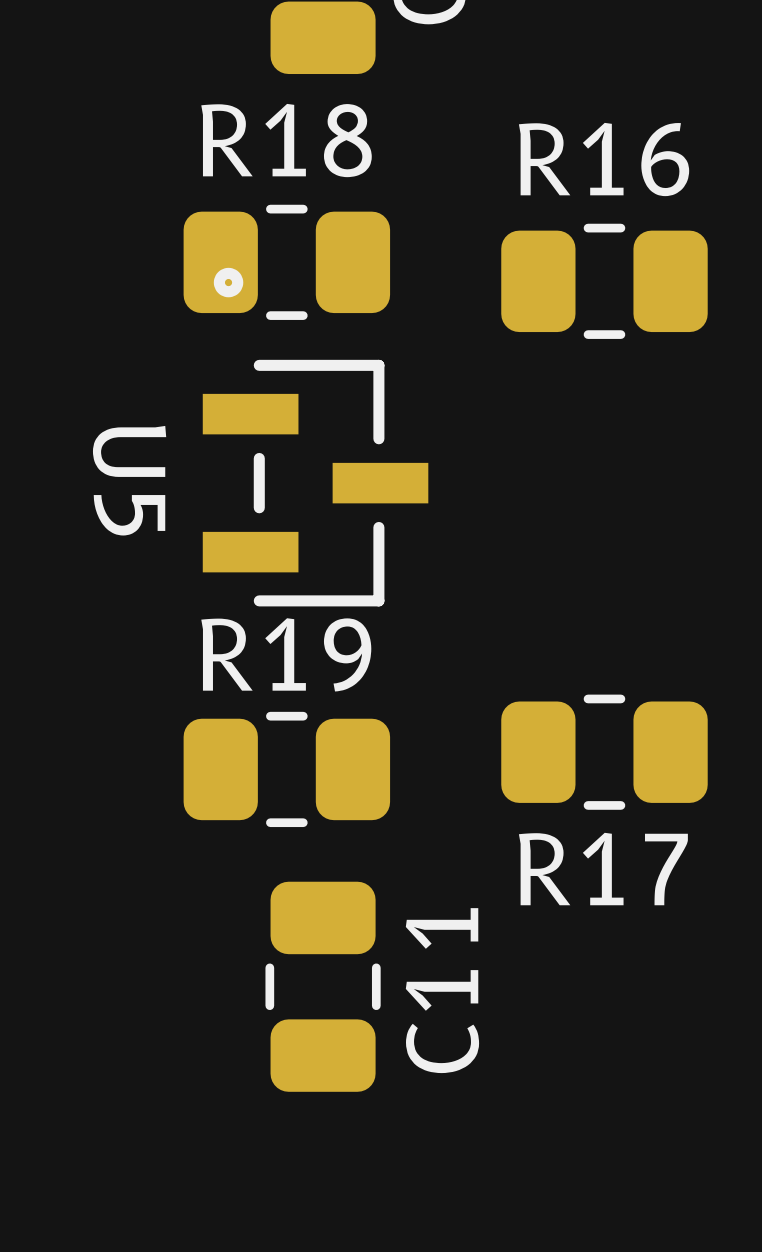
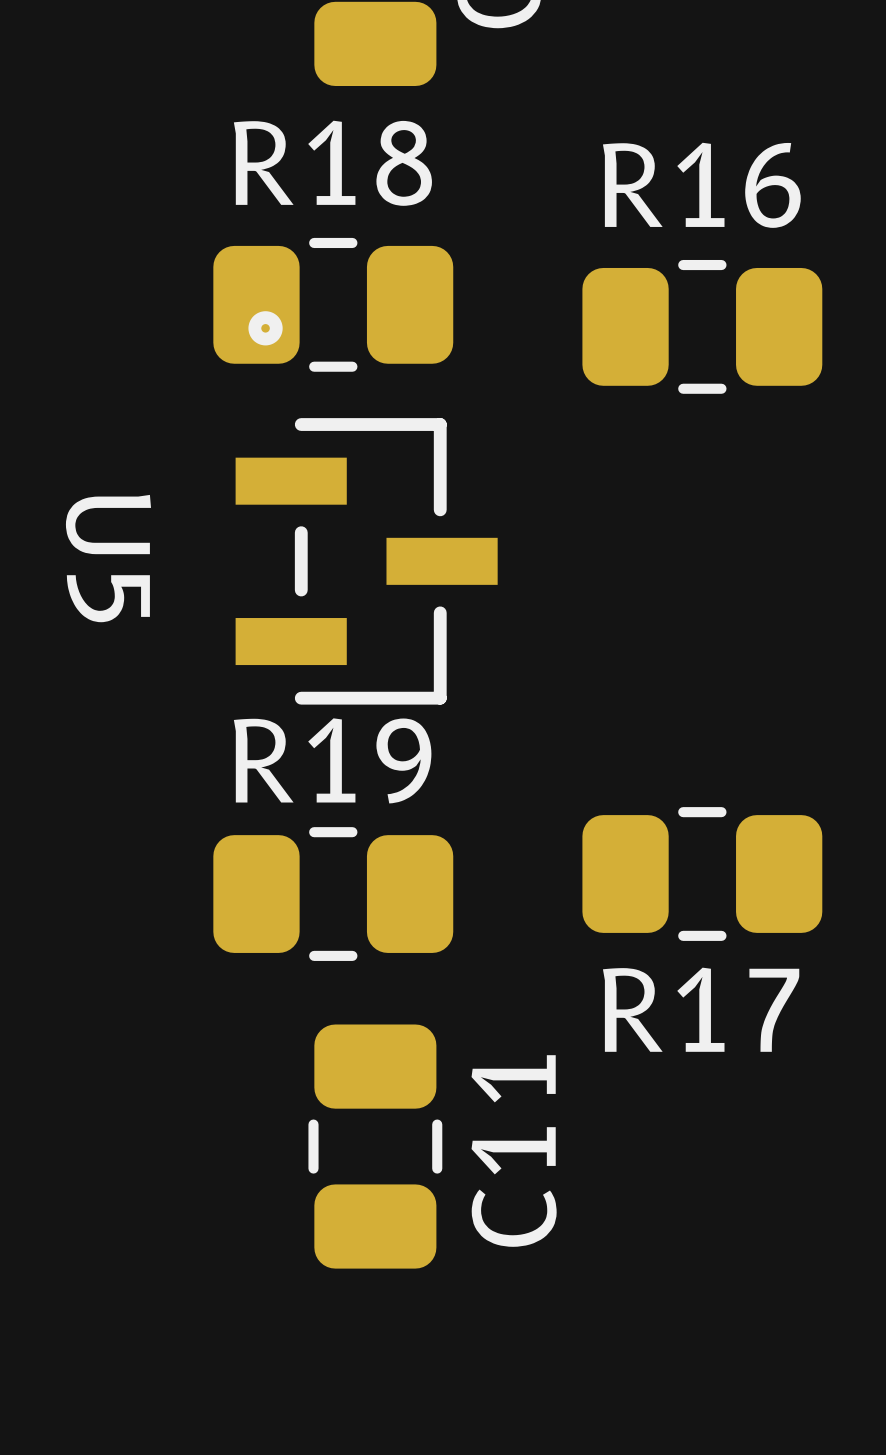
U5 name position: U5 (129, 480) -> U5 (108, 558)

